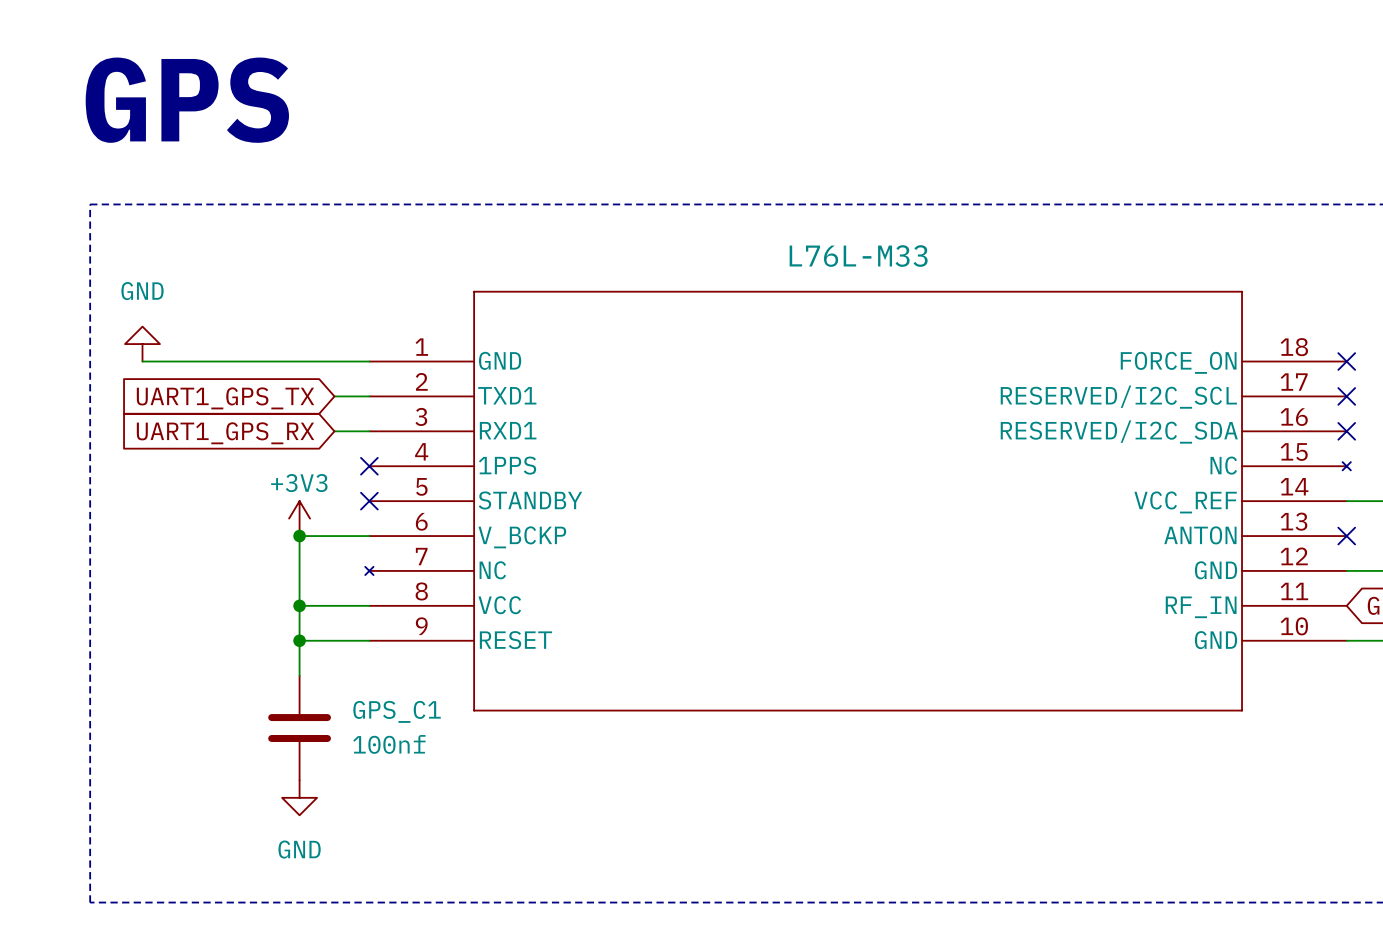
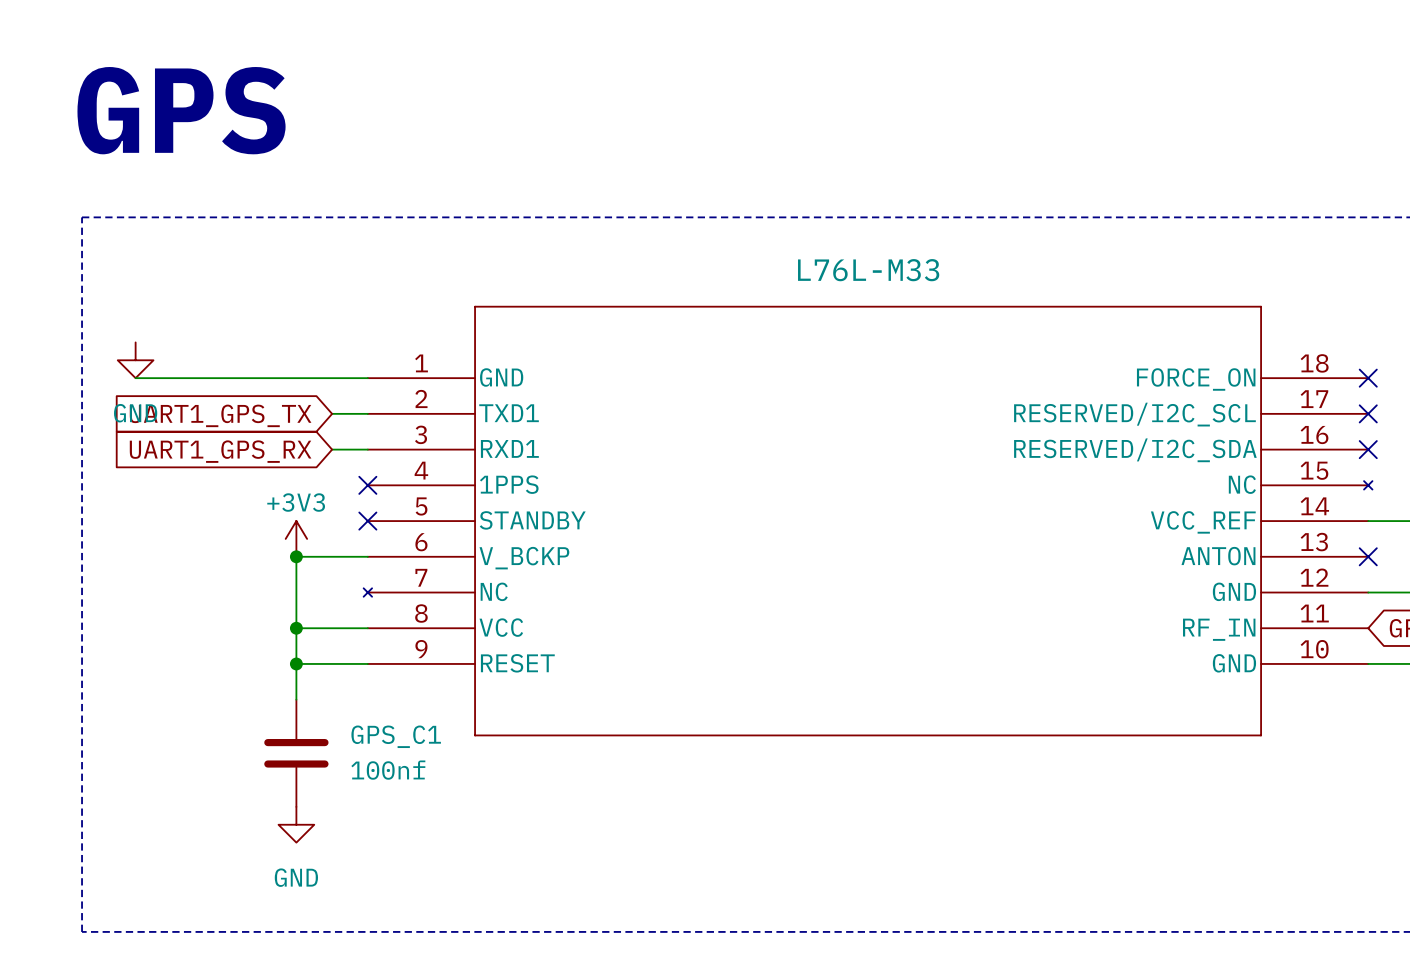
power symbol rotation: 0° (142, 344) -> 180° (135, 360)

